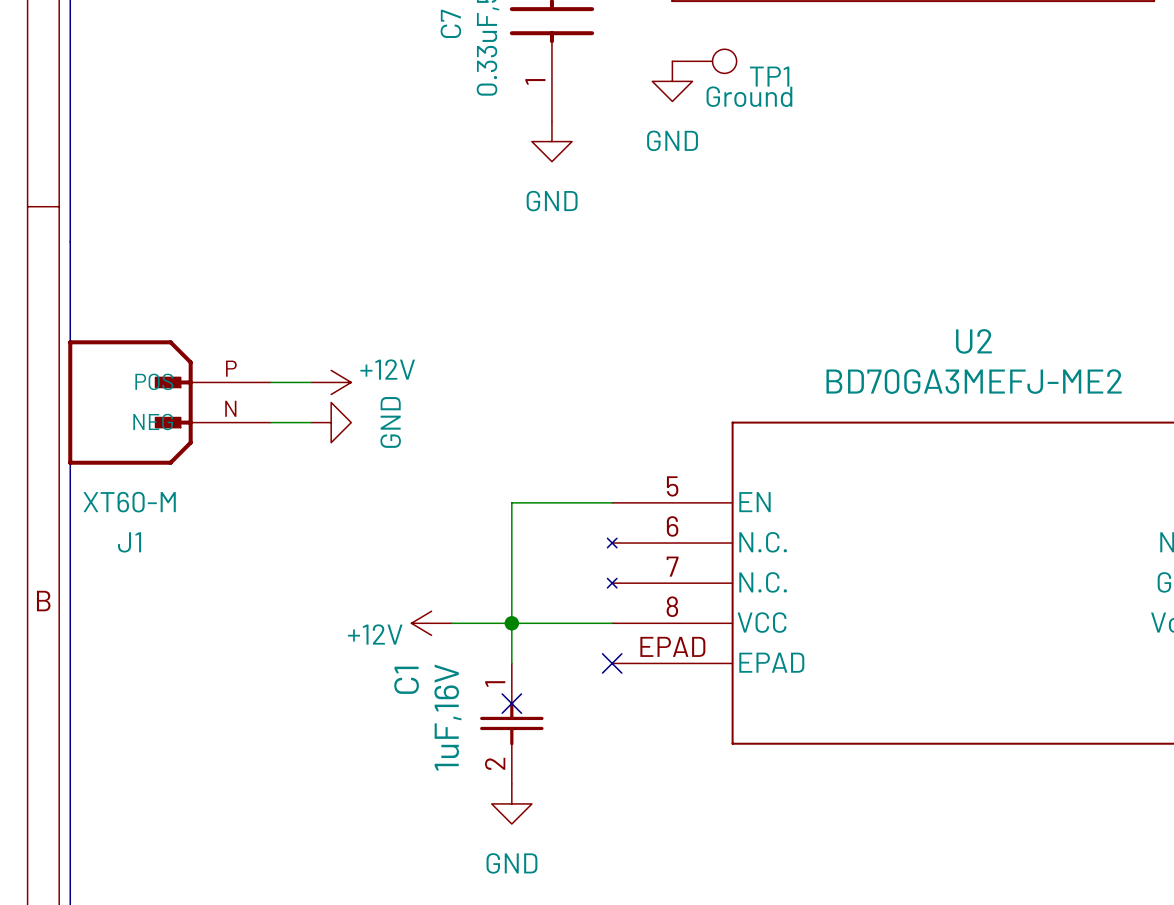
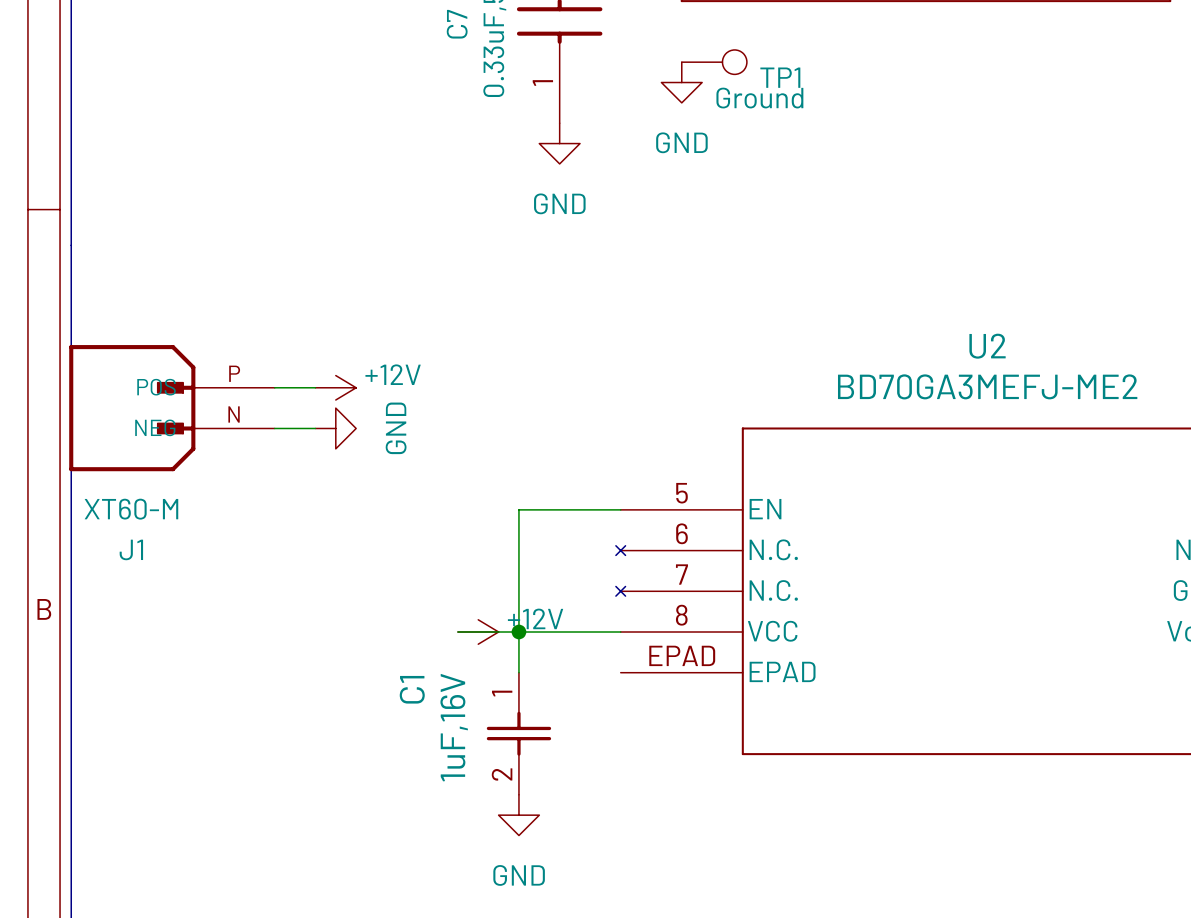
power symbol rotation: 0° (431, 623) -> 180° (478, 632)
power symbol position: +12V (431, 623) -> +12V (478, 632)
no-connect mark: (612, 663) -> none
no-connect mark: (511, 703) -> none

